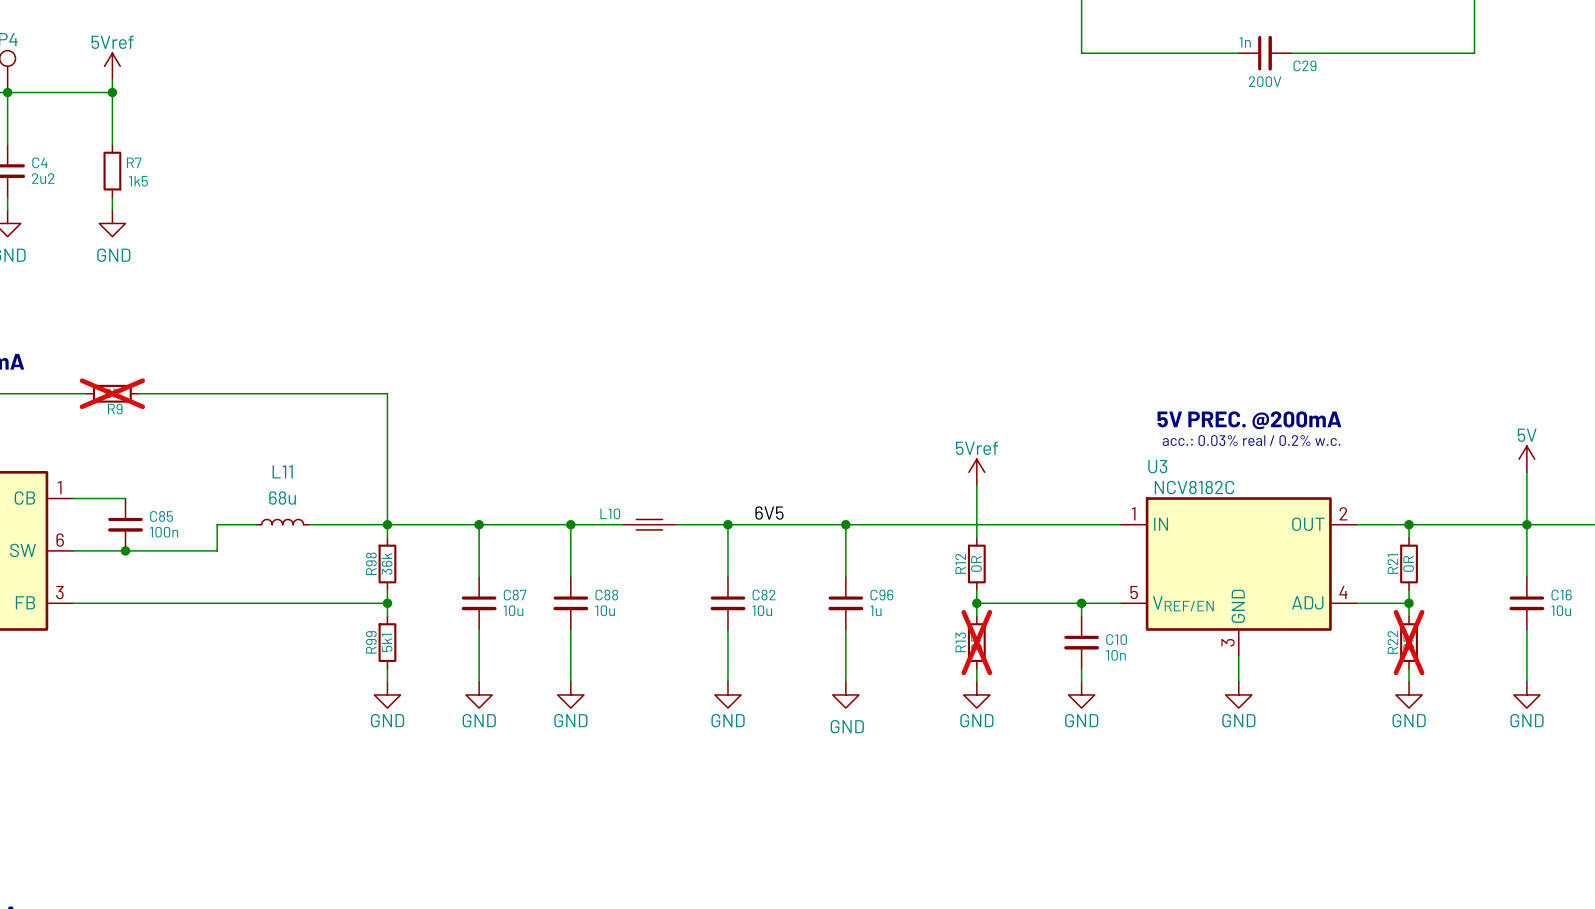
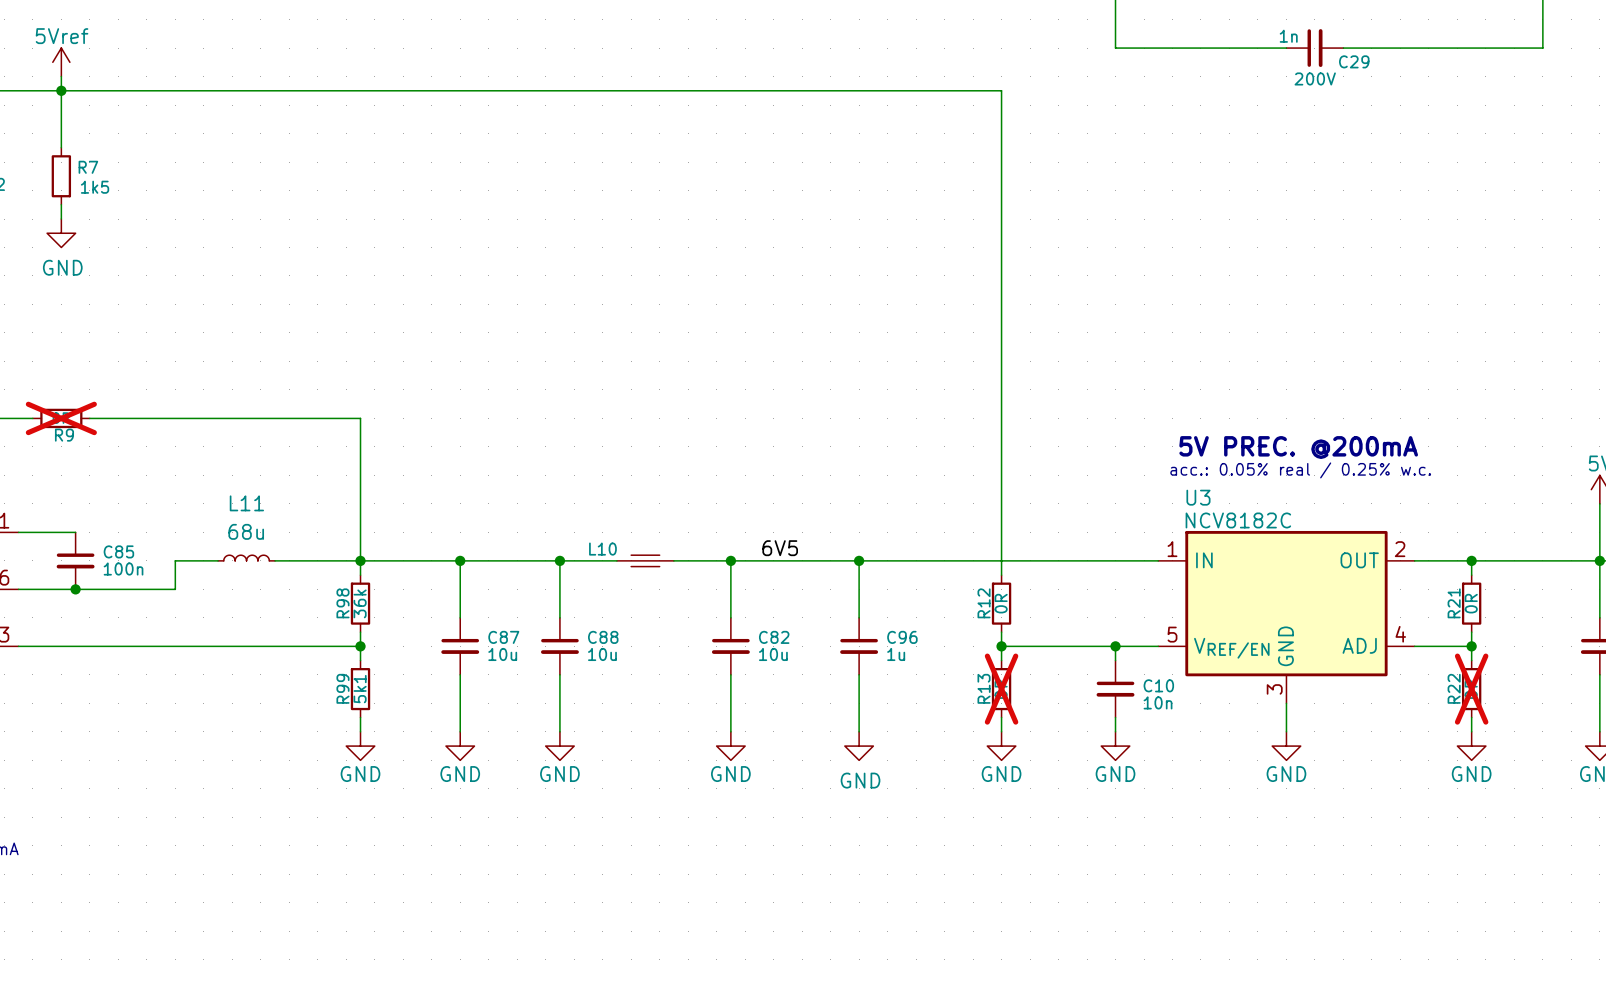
wire: none -> (61, 90) (1001, 90) (1001, 518)
text: acc.: 0.03% real / 0.2% w.c. (1251, 440) -> acc.: 0.05% real / 0.25% w.c. (1300, 470)
power symbol: 5Vref (976, 472) -> none

